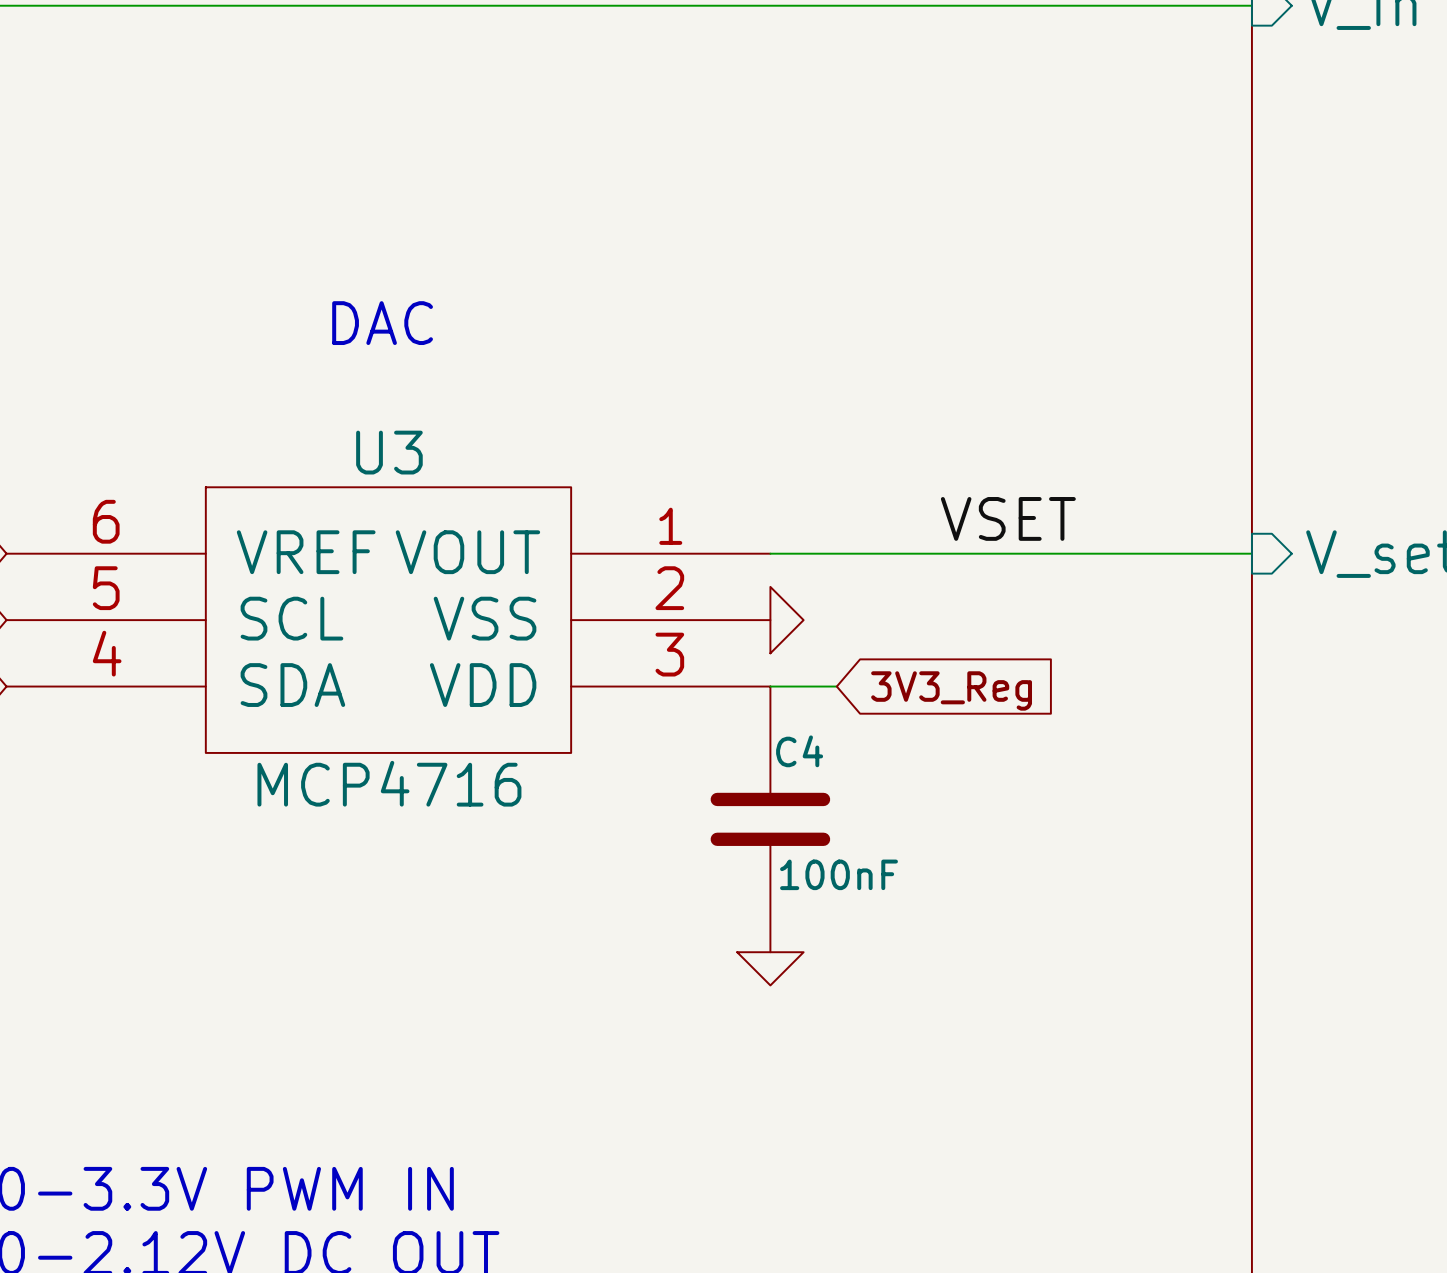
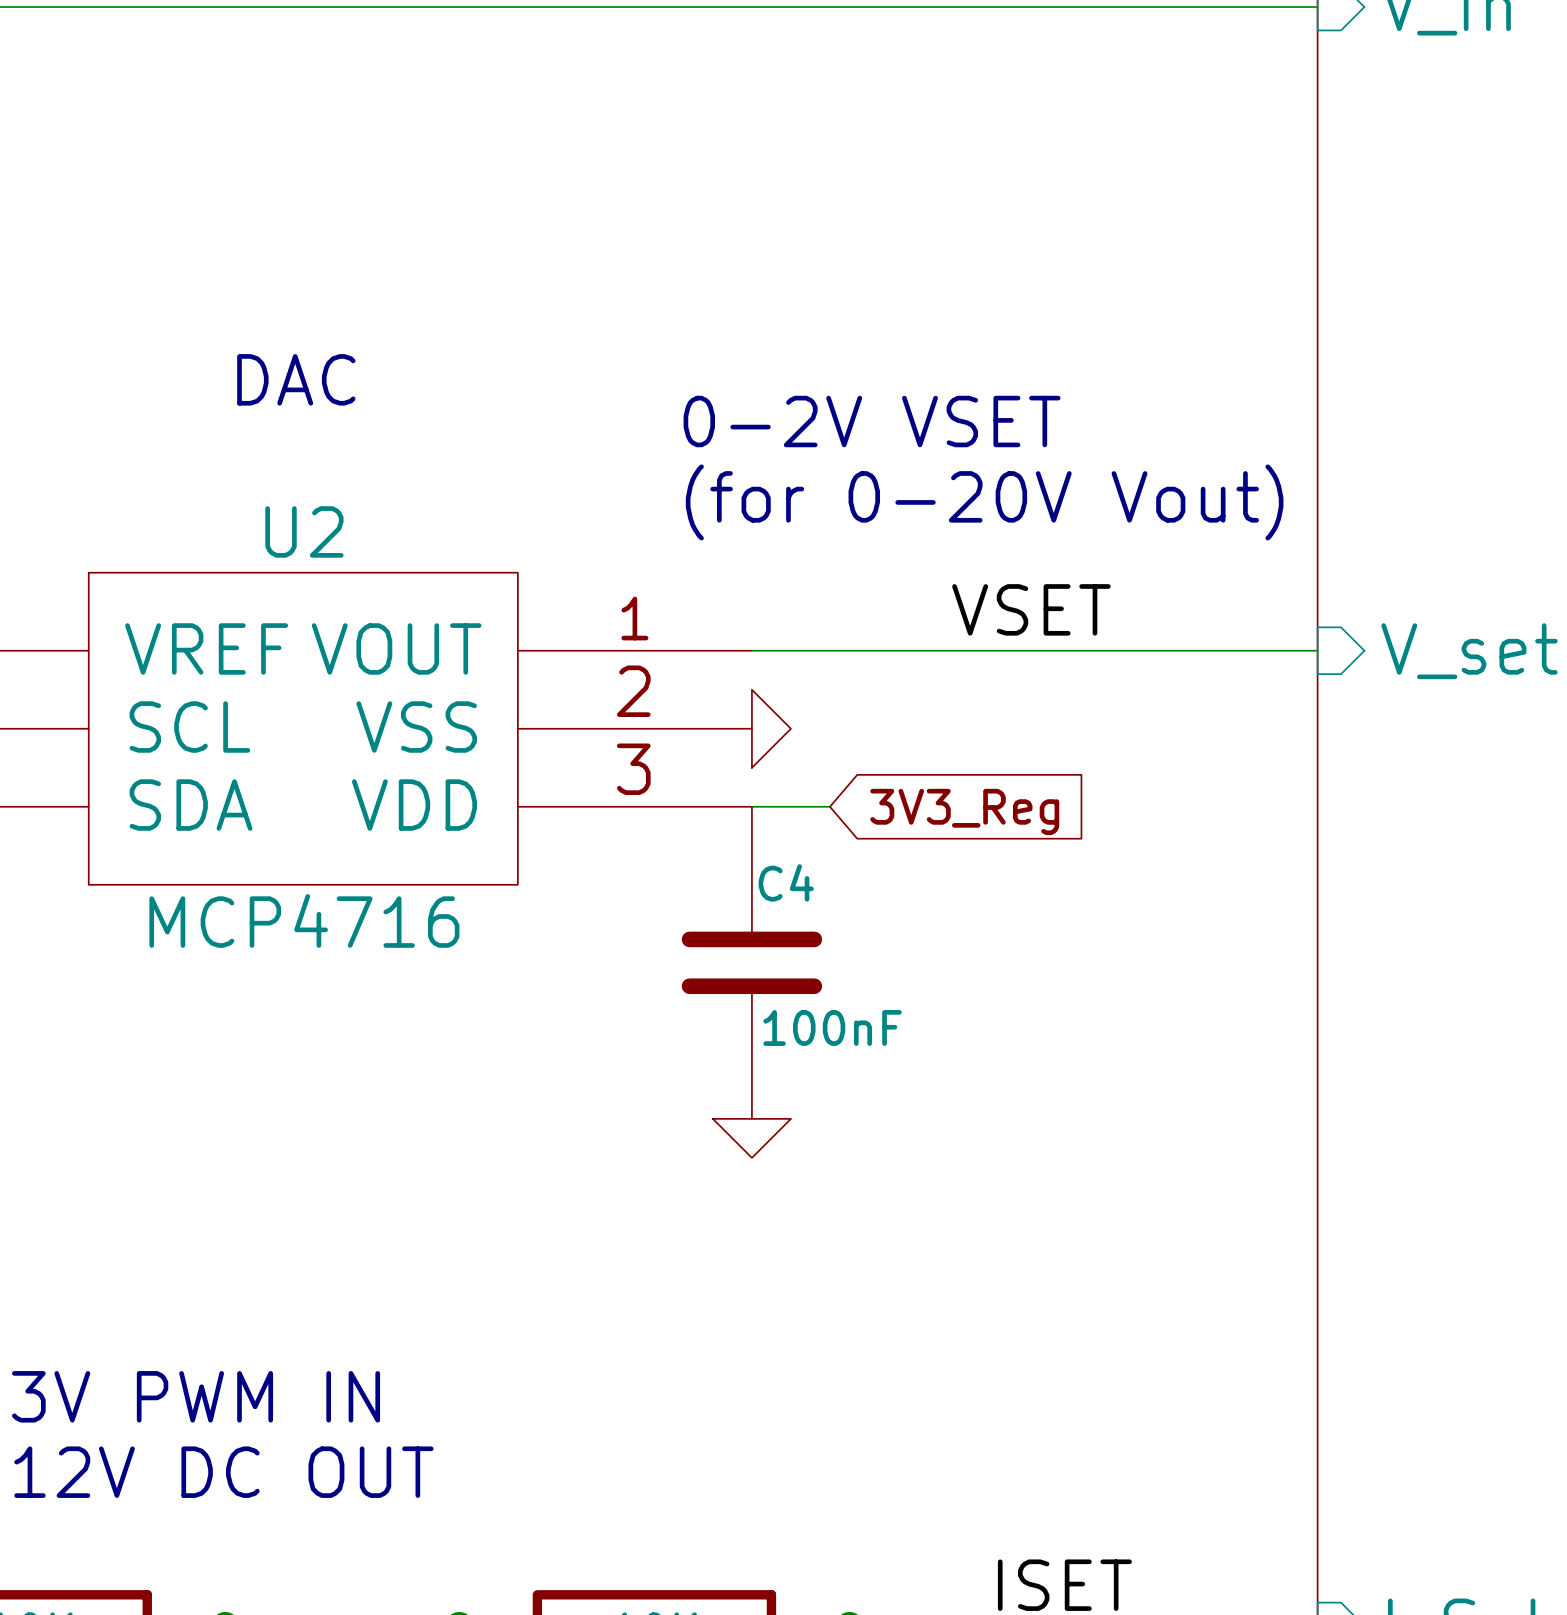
text: none -> 0-2V VSET (872, 421)
text: none -> (for 0-20V Vout) (984, 502)
U3 name: U3 (389, 452) -> U2 (304, 531)

